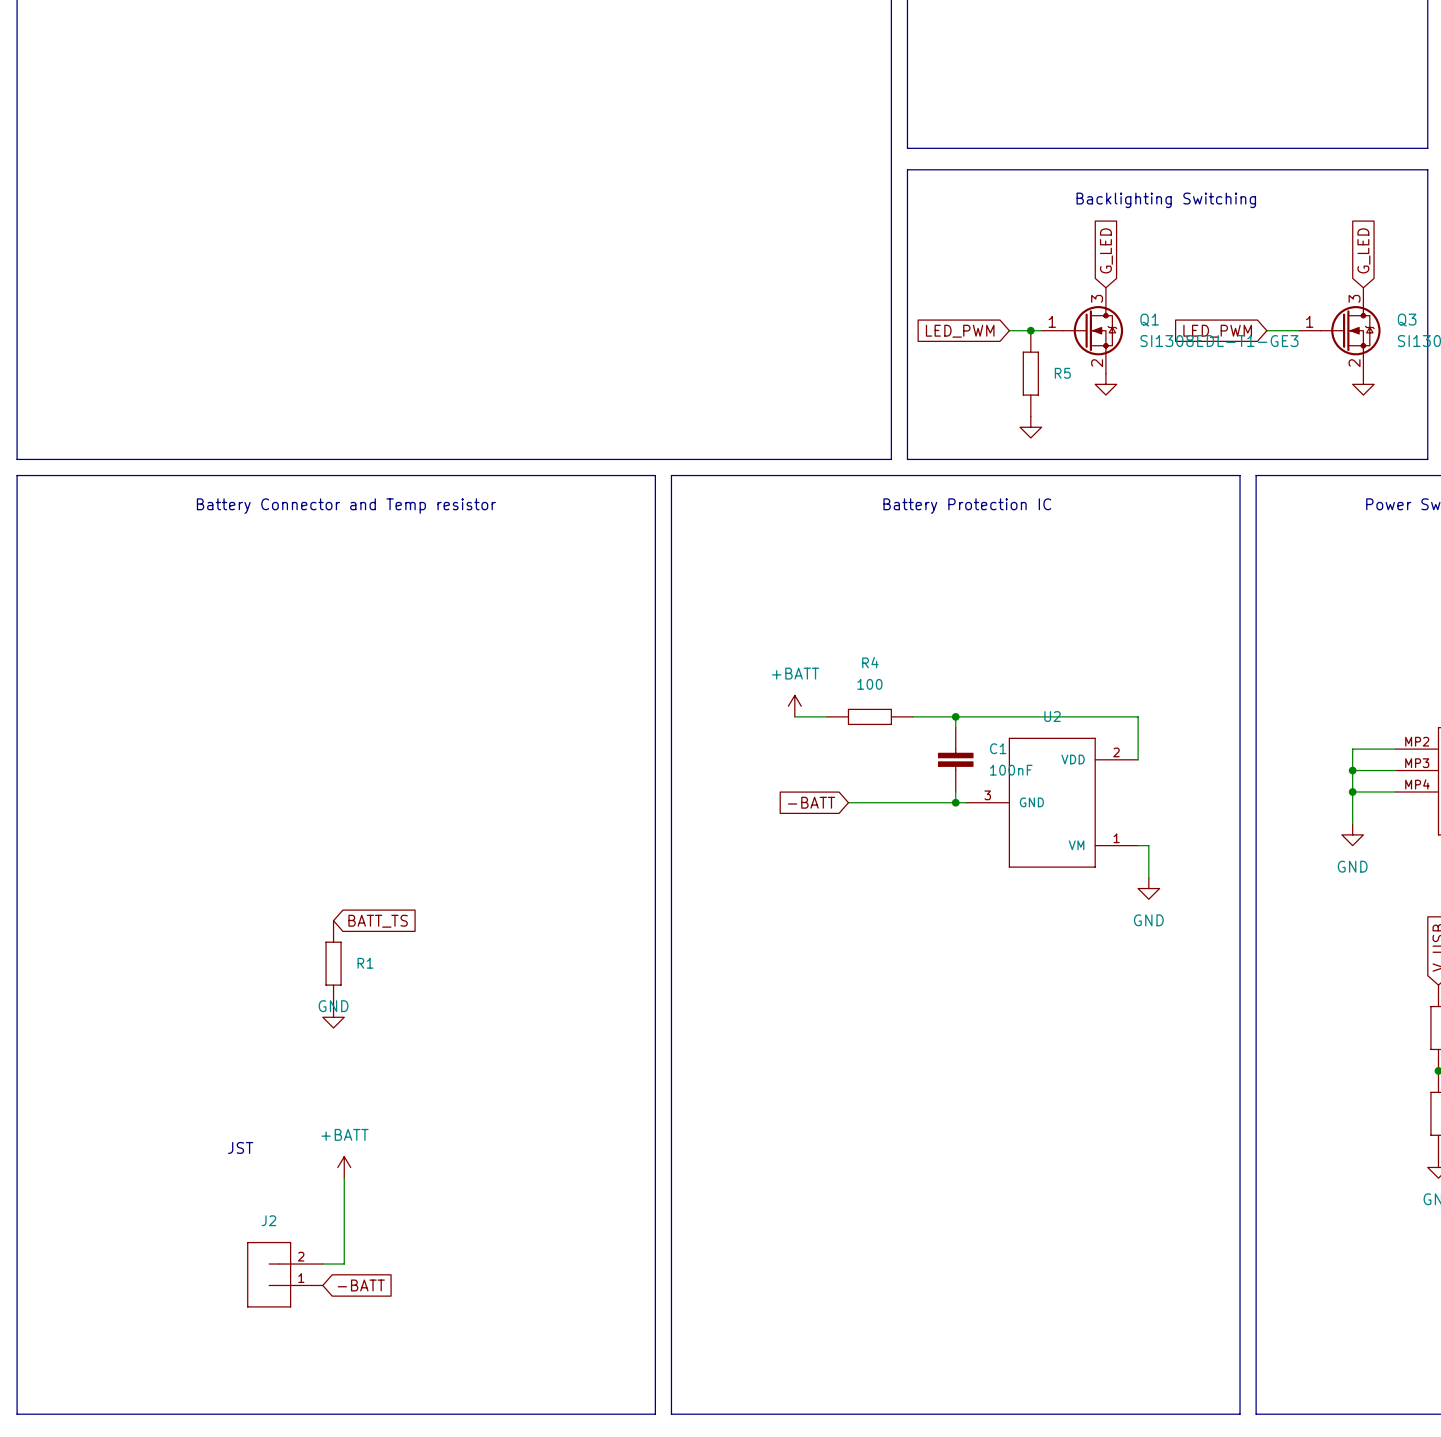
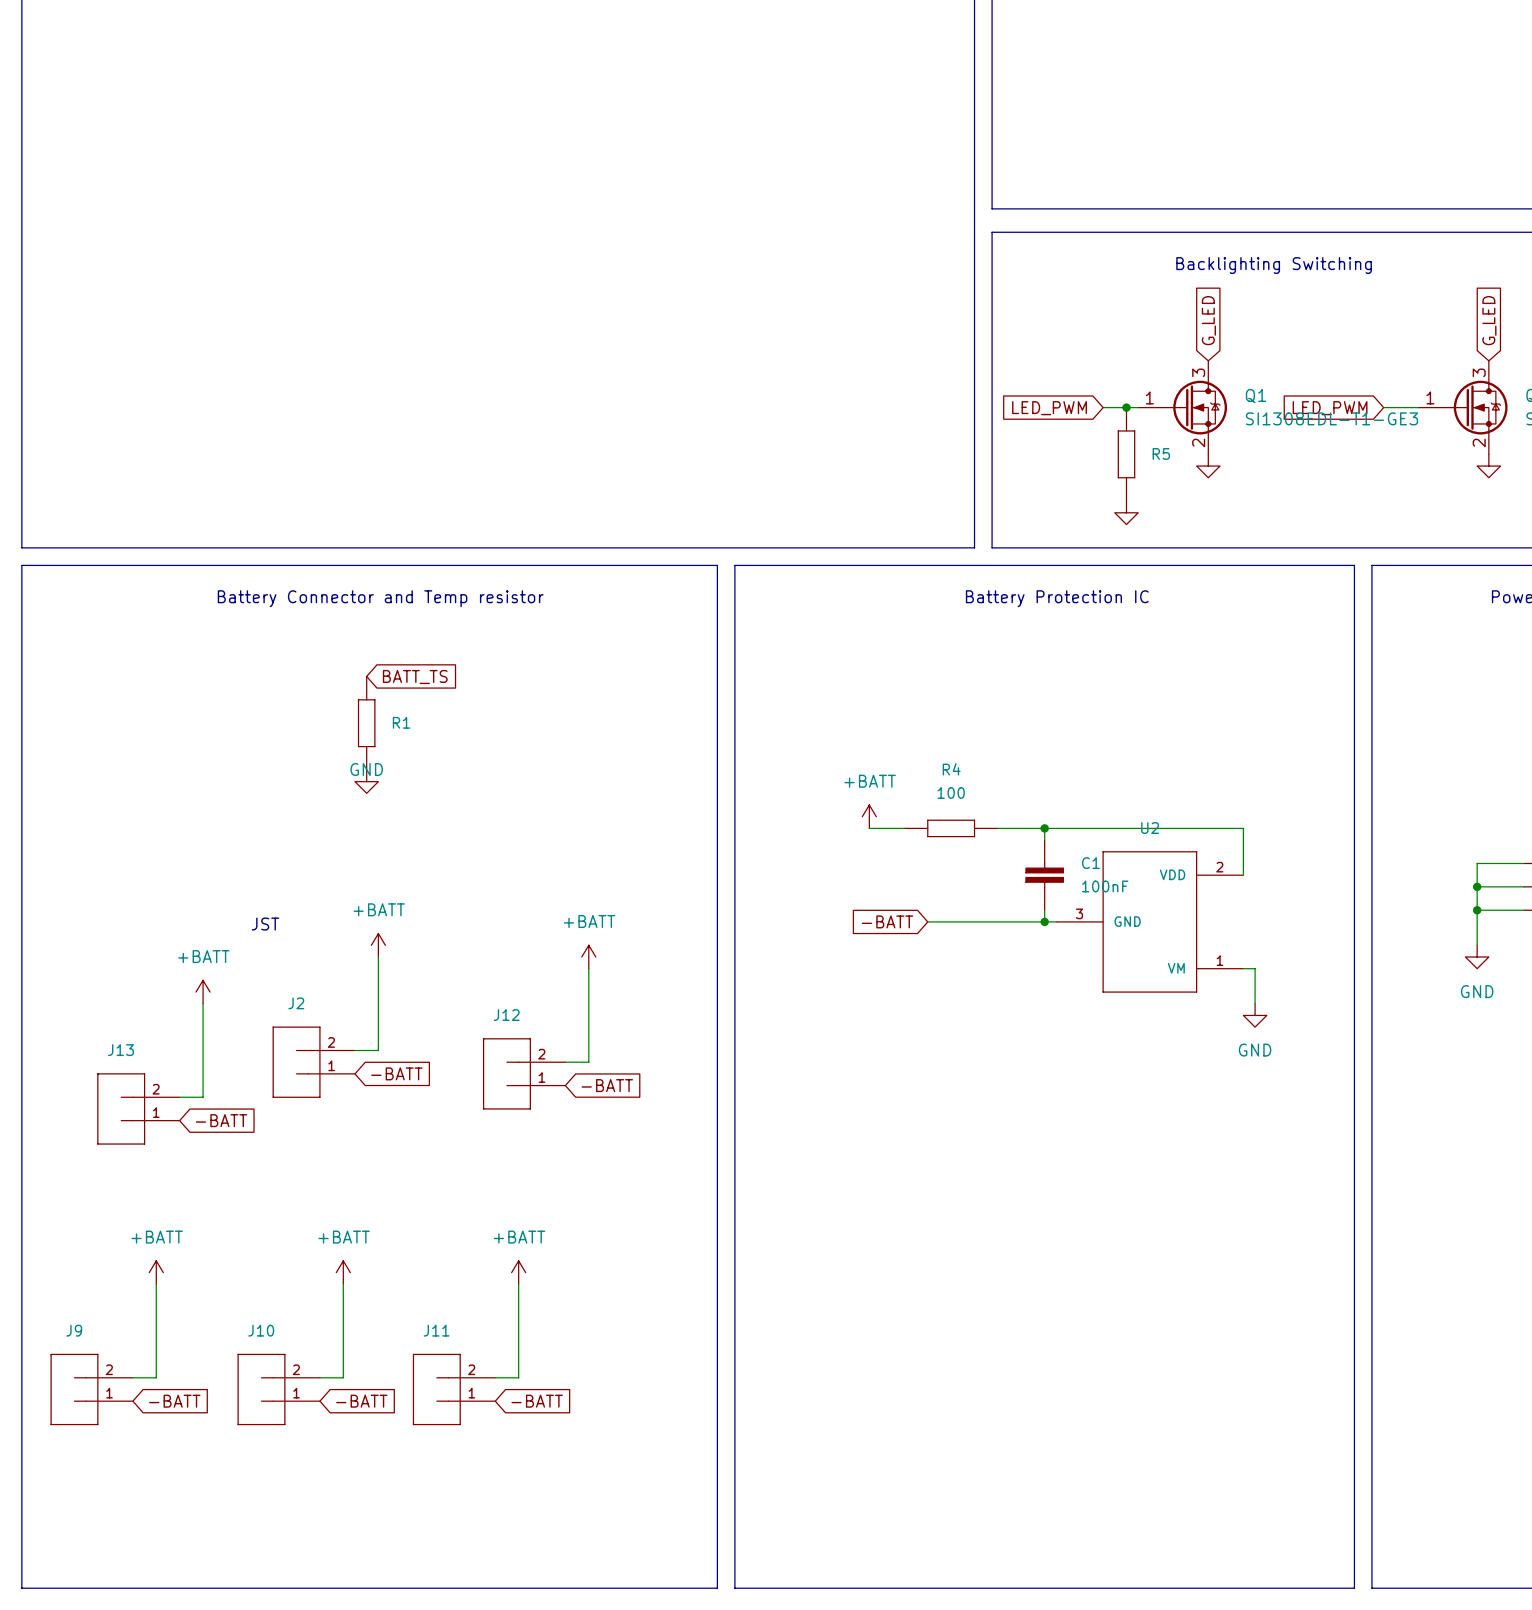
global label: none -> BATT_TS (415, 677)
power symbol: none -> GND (366, 781)
text: none -> JST (265, 924)
power symbol: none -> +BATT (378, 945)
wire: none -> (378, 957) (378, 1050) (355, 1050)
power symbol: none -> +BATT (588, 957)
wire: none -> (588, 968) (588, 1062) (565, 1062)
power symbol: none -> +BATT (203, 992)
wire: none -> (203, 1003) (203, 1097) (179, 1097)
global label: BATT_TS (378, 921) -> -BATT (396, 1073)
J12: none -> (524, 1073)
global label: none -> -BATT (607, 1085)
R1 position: (333, 963) -> (366, 723)
J13: none -> (138, 1108)
global label: none -> -BATT (221, 1120)
power symbol: GND (333, 1017) -> none
power symbol: none -> +BATT (156, 1272)
power symbol: none -> +BATT (518, 1272)
wire: none -> (156, 1284) (156, 1377) (132, 1377)
wire: none -> (518, 1284) (518, 1377) (495, 1377)
text: JST (240, 1147) -> none
power symbol position: +BATT (344, 1167) -> +BATT (343, 1272)
wire: (344, 1178) (344, 1264) (322, 1264) -> (343, 1284) (343, 1377) (319, 1377)
J9: none -> (92, 1389)
J10: none -> (279, 1389)
J11: none -> (454, 1389)
global label: none -> -BATT (174, 1401)
global label: none -> -BATT (537, 1401)
J2 position: (285, 1274) -> (314, 1062)
global label position: -BATT (361, 1285) -> -BATT (361, 1401)

